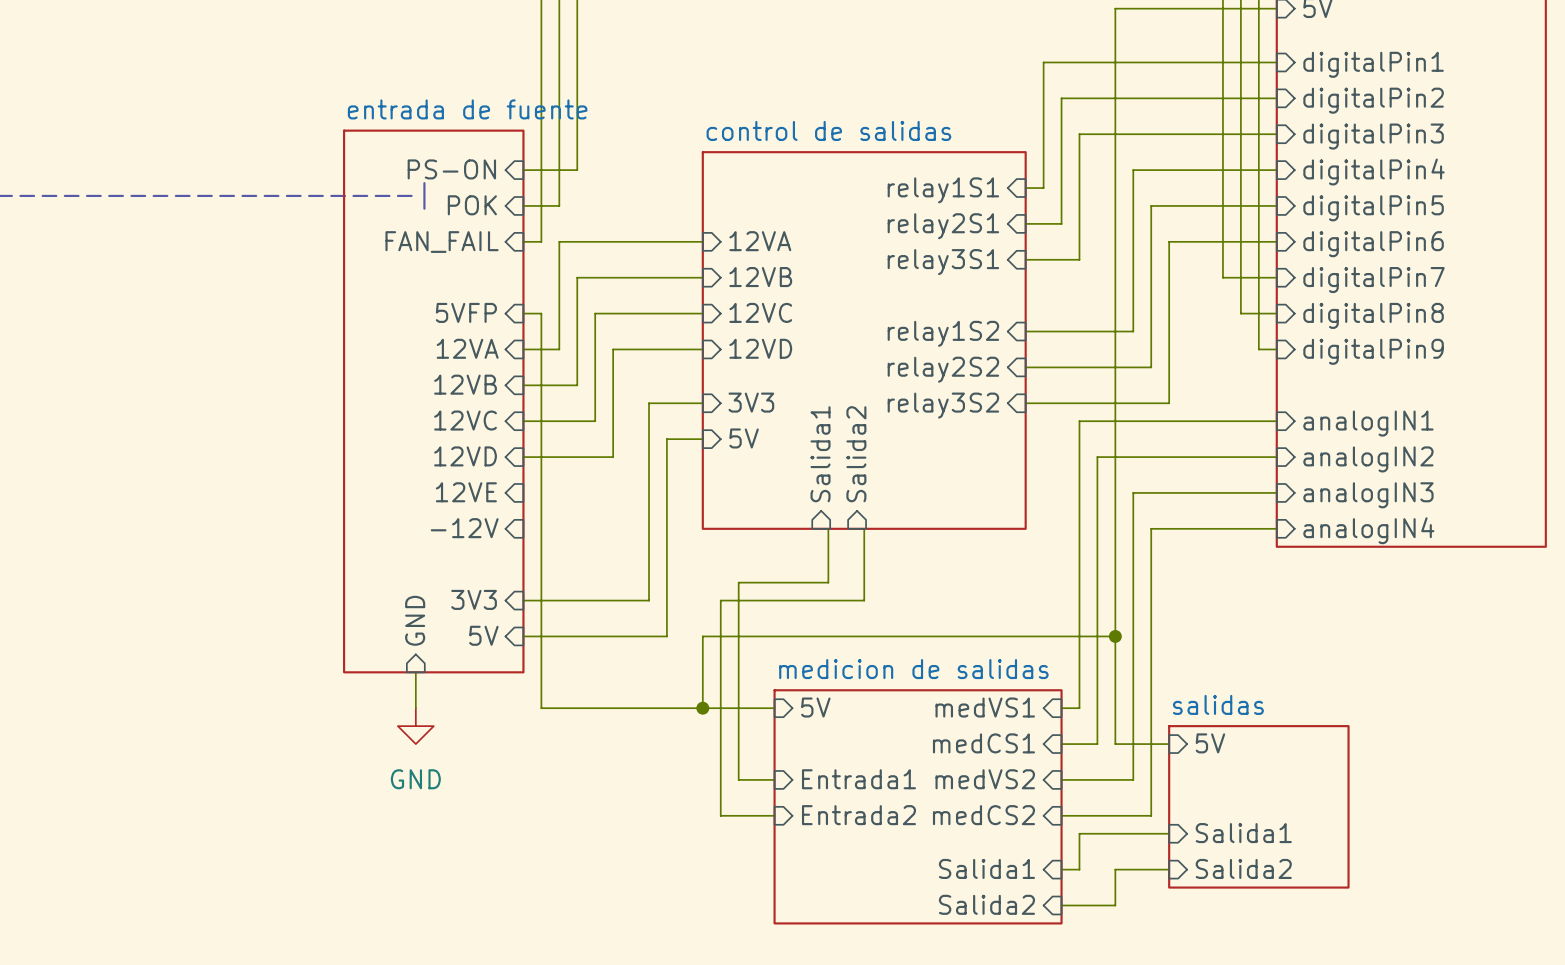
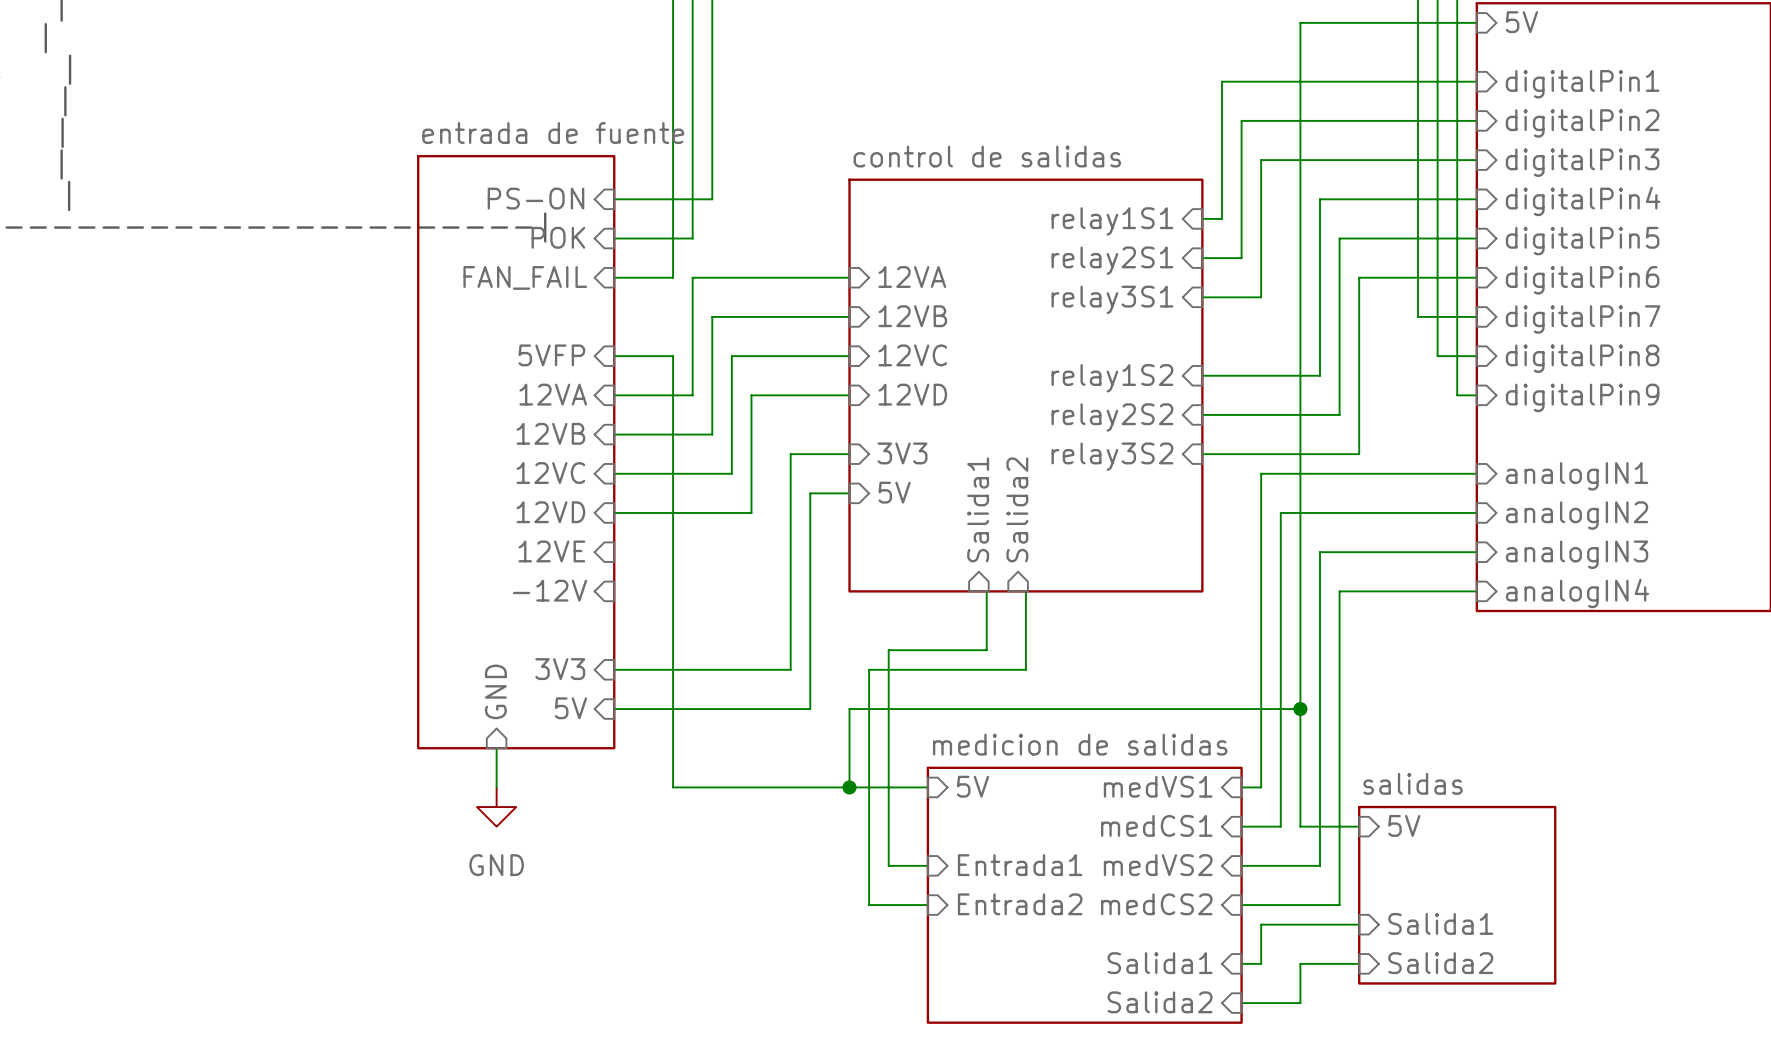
sheet pin position: PS-ON (451, 169) -> PS-ON (535, 198)
wire: none -> (614, 199) (653, 199)
sheet pin position: POK (472, 205) -> POK (558, 237)
wire: none -> (614, 238) (653, 238)
wire: none -> (614, 277) (653, 277)
sheet pin position: FAN_FAIL (442, 242) -> FAN_FAIL (525, 277)
sheet pin position: 5VFP (466, 312) -> 5VFP (551, 355)
wire: none -> (614, 356) (653, 356)
sheet pin position: 12VA (467, 348) -> 12VA (553, 394)
wire: none -> (614, 395) (653, 395)
sheet pin position: 12VB (465, 384) -> 12VB (550, 433)
wire: none -> (614, 434) (653, 434)
sheet entrada de fuente position: (433, 401) -> (516, 452)
sheet pin position: 12VC (465, 420) -> 12VC (550, 473)
wire: none -> (614, 473) (653, 473)
sheet pin position: 12VD (465, 456) -> 12VD (550, 512)
wire: none -> (614, 512) (653, 512)
sheet pin position: 12VE (466, 492) -> 12VE (551, 551)
sheet pin position: -12V (464, 528) -> -12V (549, 590)
sheet pin position: 3V3 (474, 599) -> 3V3 (560, 669)
wire: none -> (614, 669) (653, 669)
sheet pin position: GND (415, 620) -> GND (495, 691)
sheet pin position: 5V (483, 635) -> 5V (571, 708)
wire: none -> (614, 709) (653, 709)
wire: (415, 672) (415, 708) -> (496, 748) (496, 787)
power symbol position: GND (415, 726) -> GND (496, 807)

